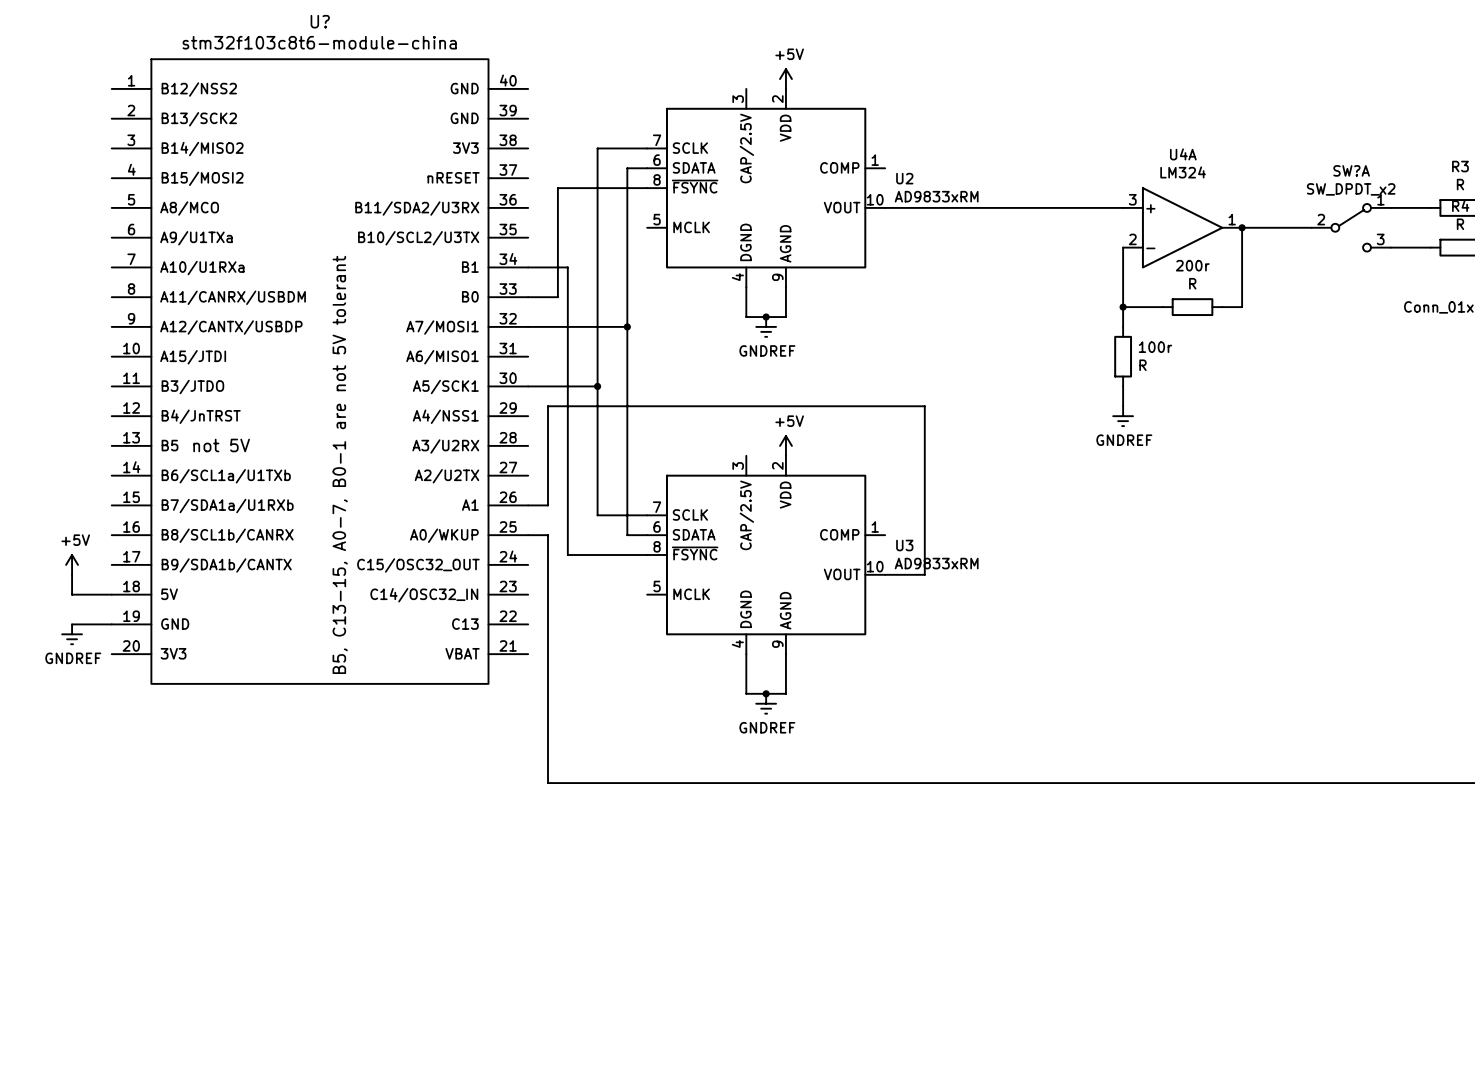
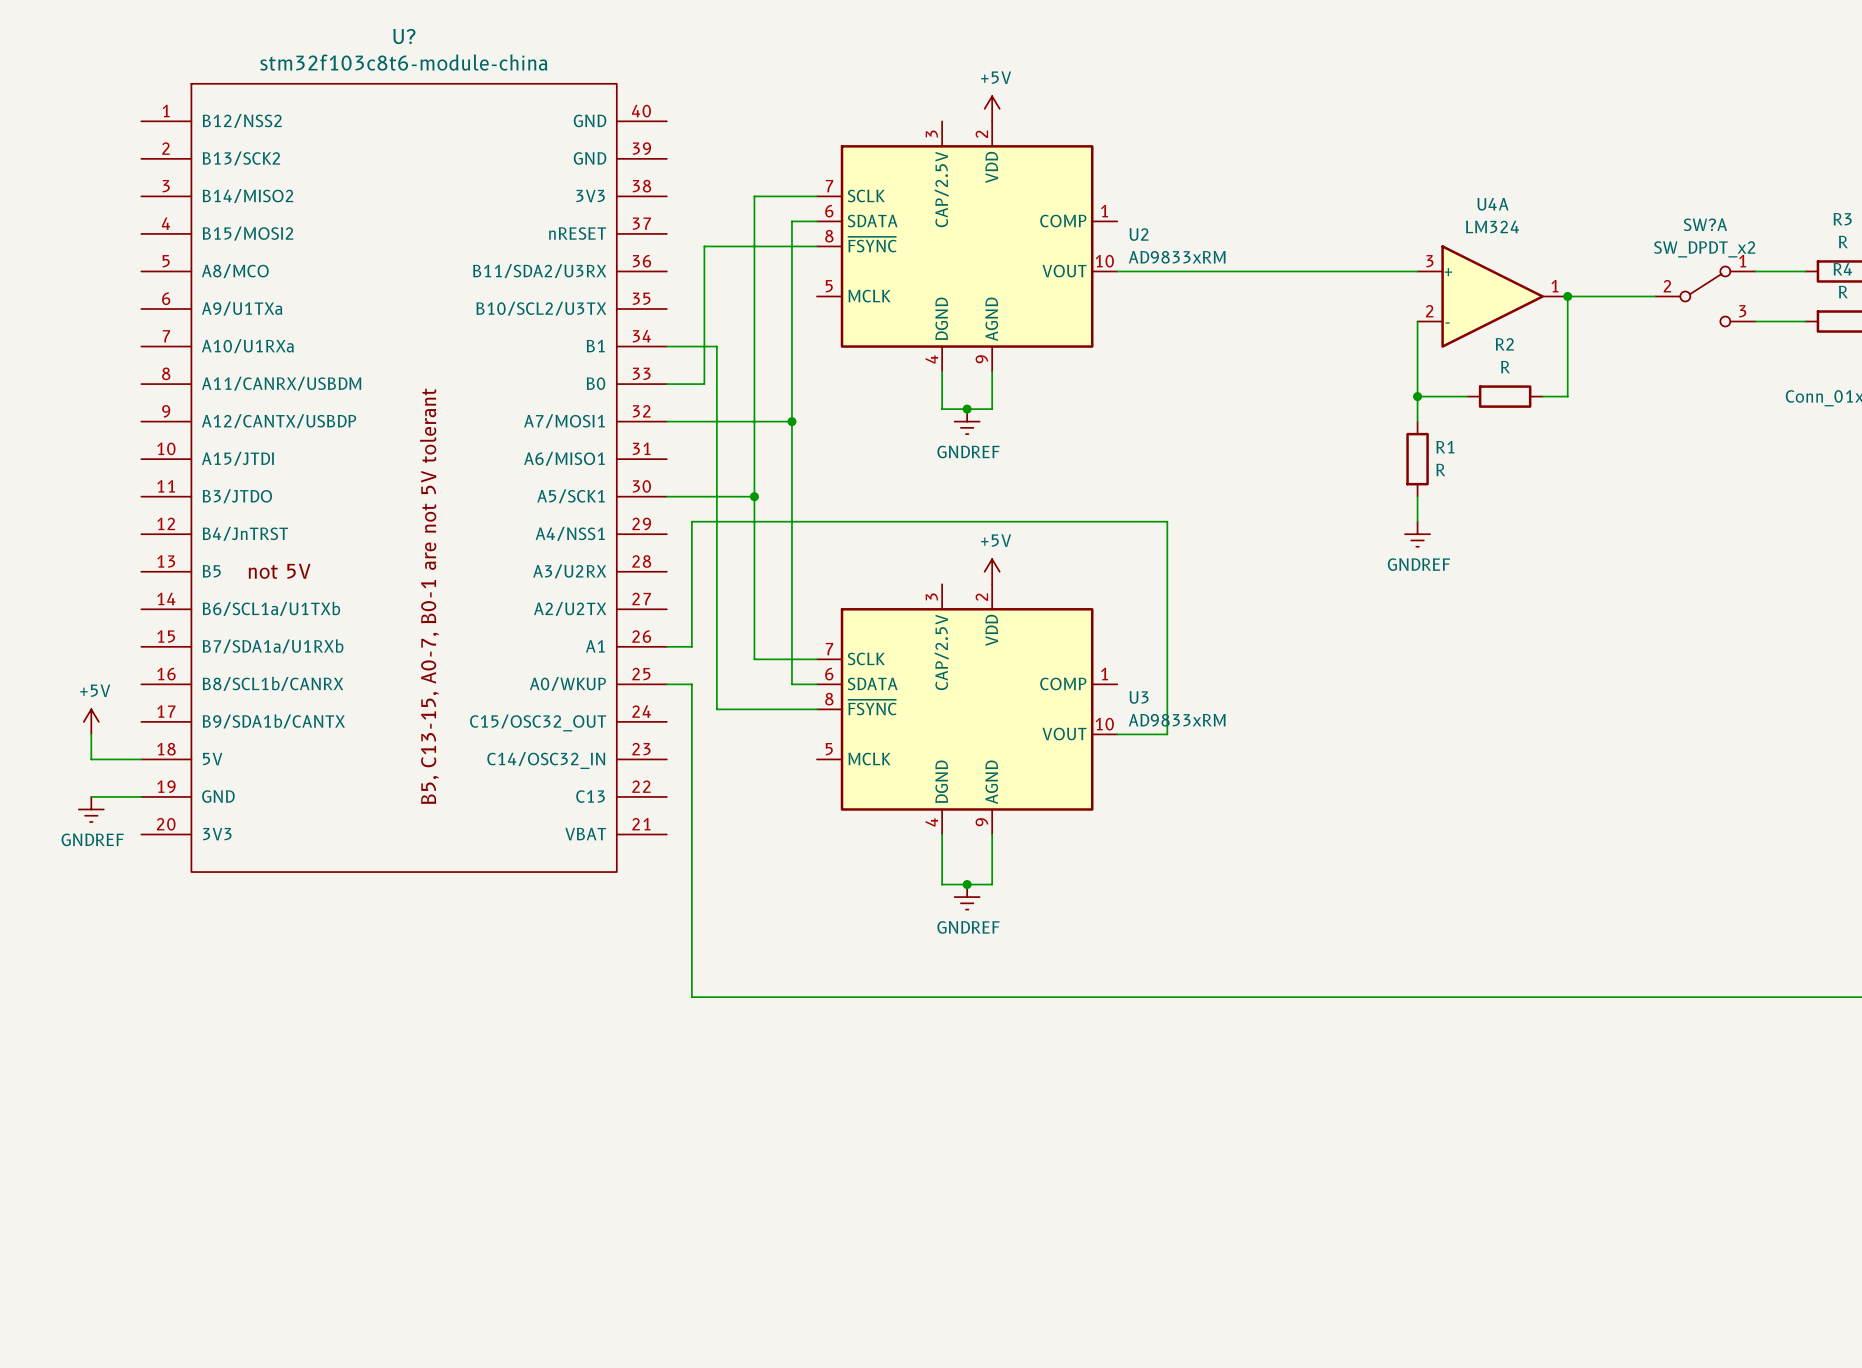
200r name: 200r (1192, 265) -> R2 (1504, 344)
100r name: 100r (1155, 347) -> R1 (1445, 447)

